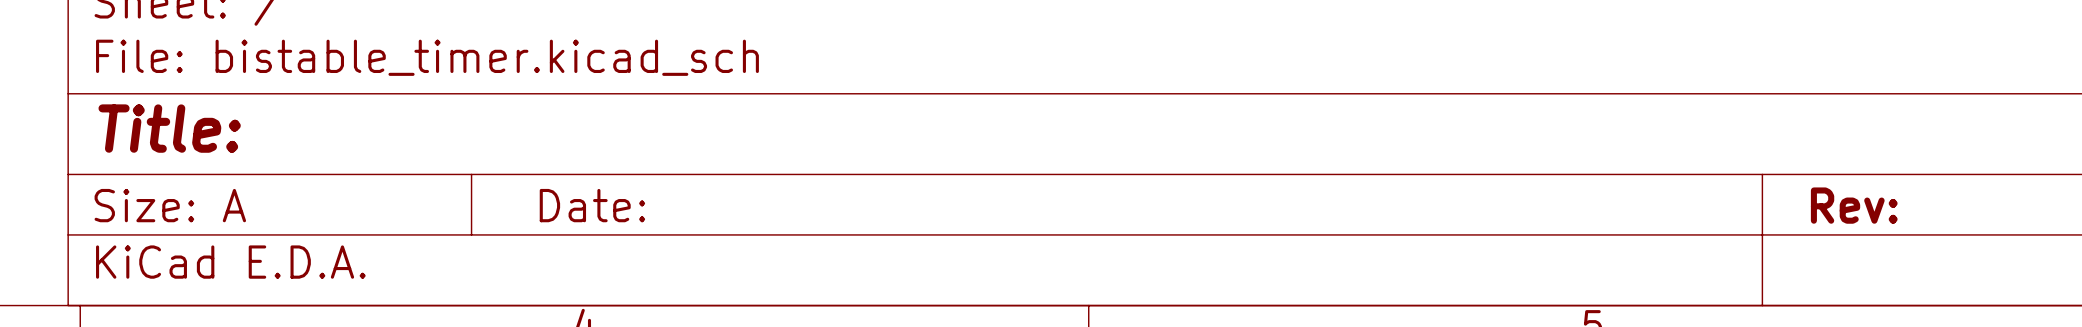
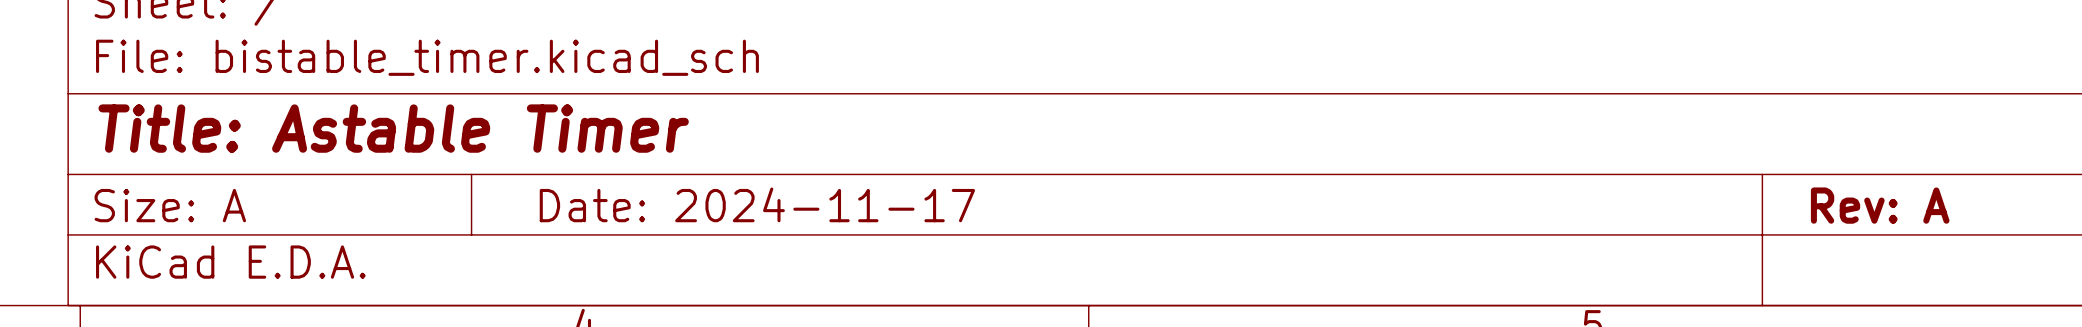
title block: Title: (169, 128) -> Title: Astable Timer (393, 128)
title block: Date: (592, 205) -> Date: 2024-11-17 (757, 204)
title block: Rev: (1854, 205) -> Rev: A (1880, 205)

